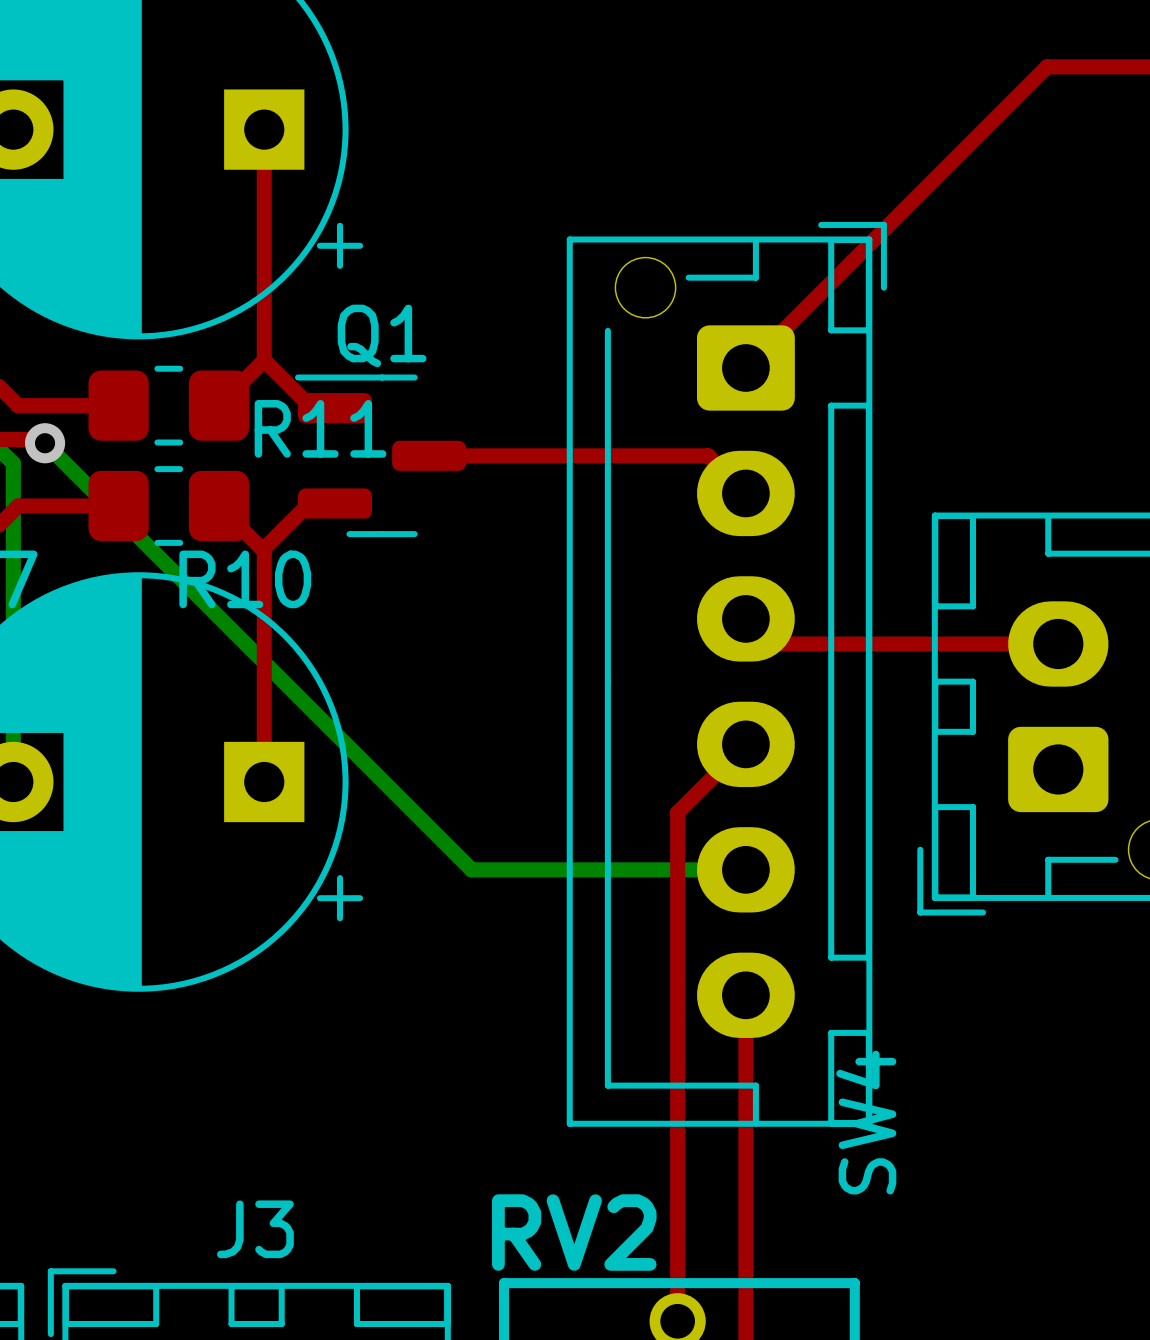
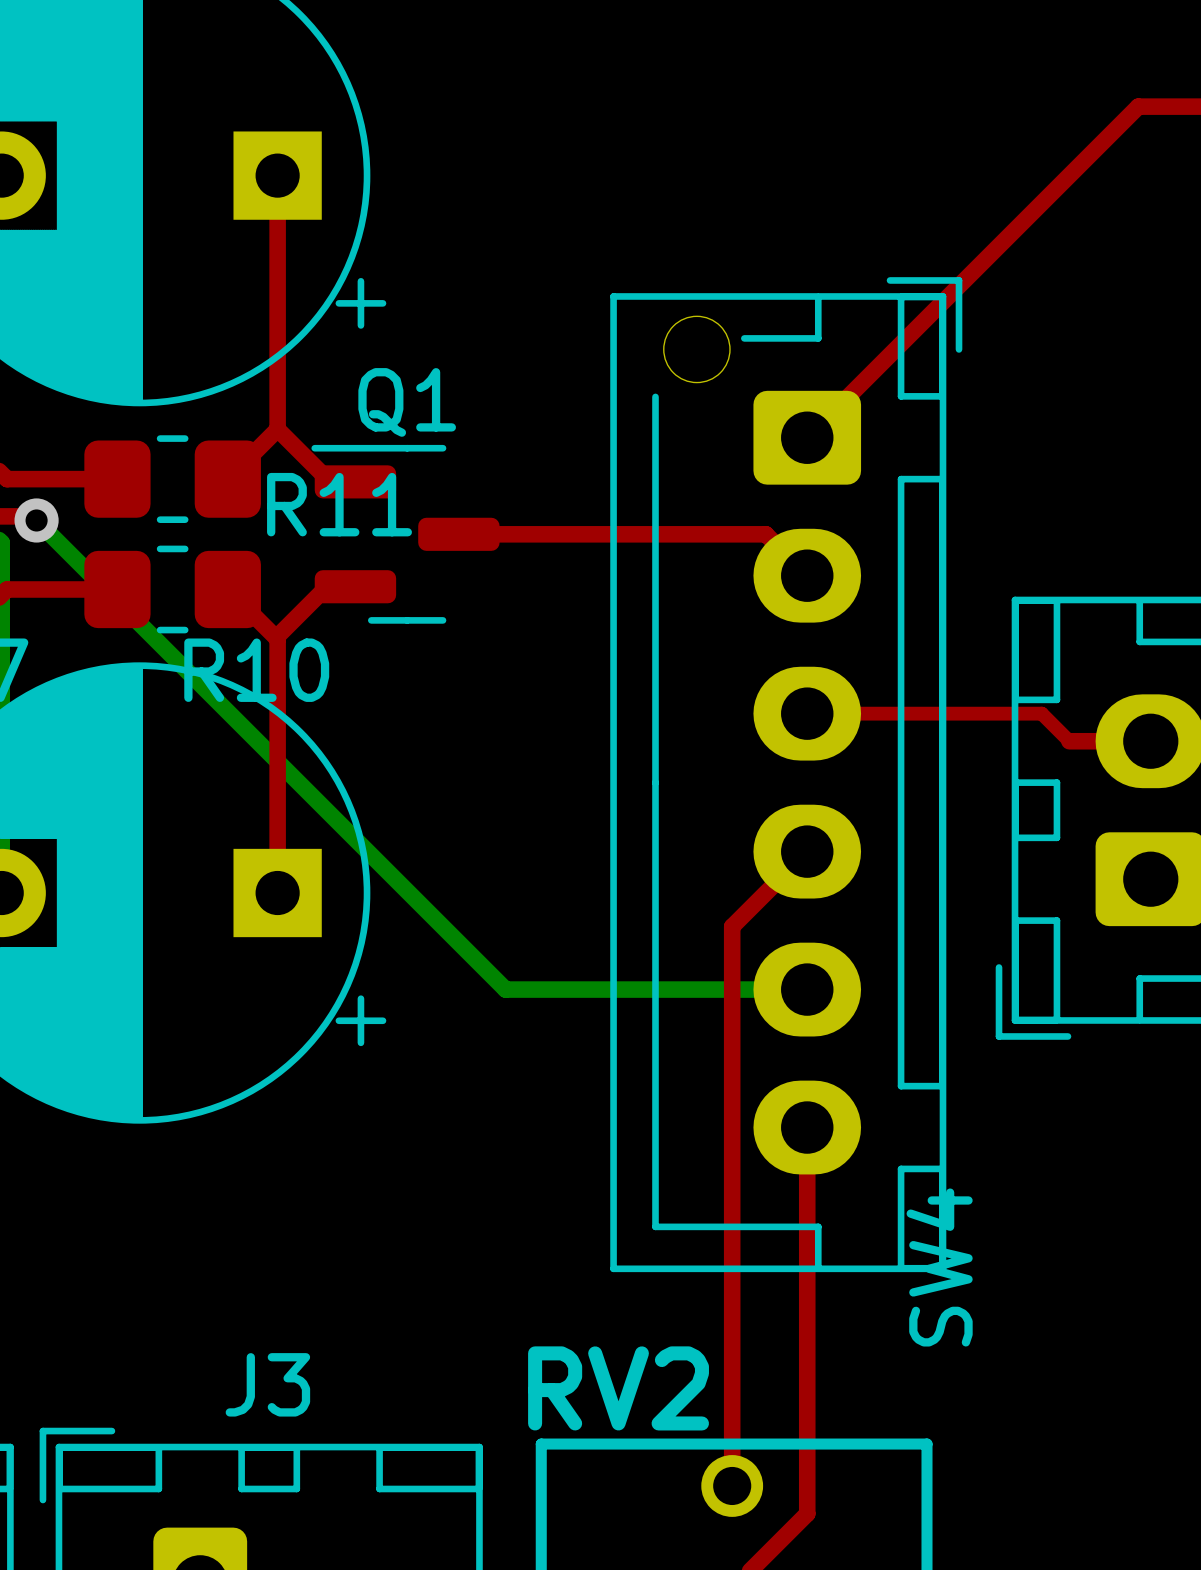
top track: (770, 644) (984, 644) -> (807, 713) (1041, 713) (1069, 741)

